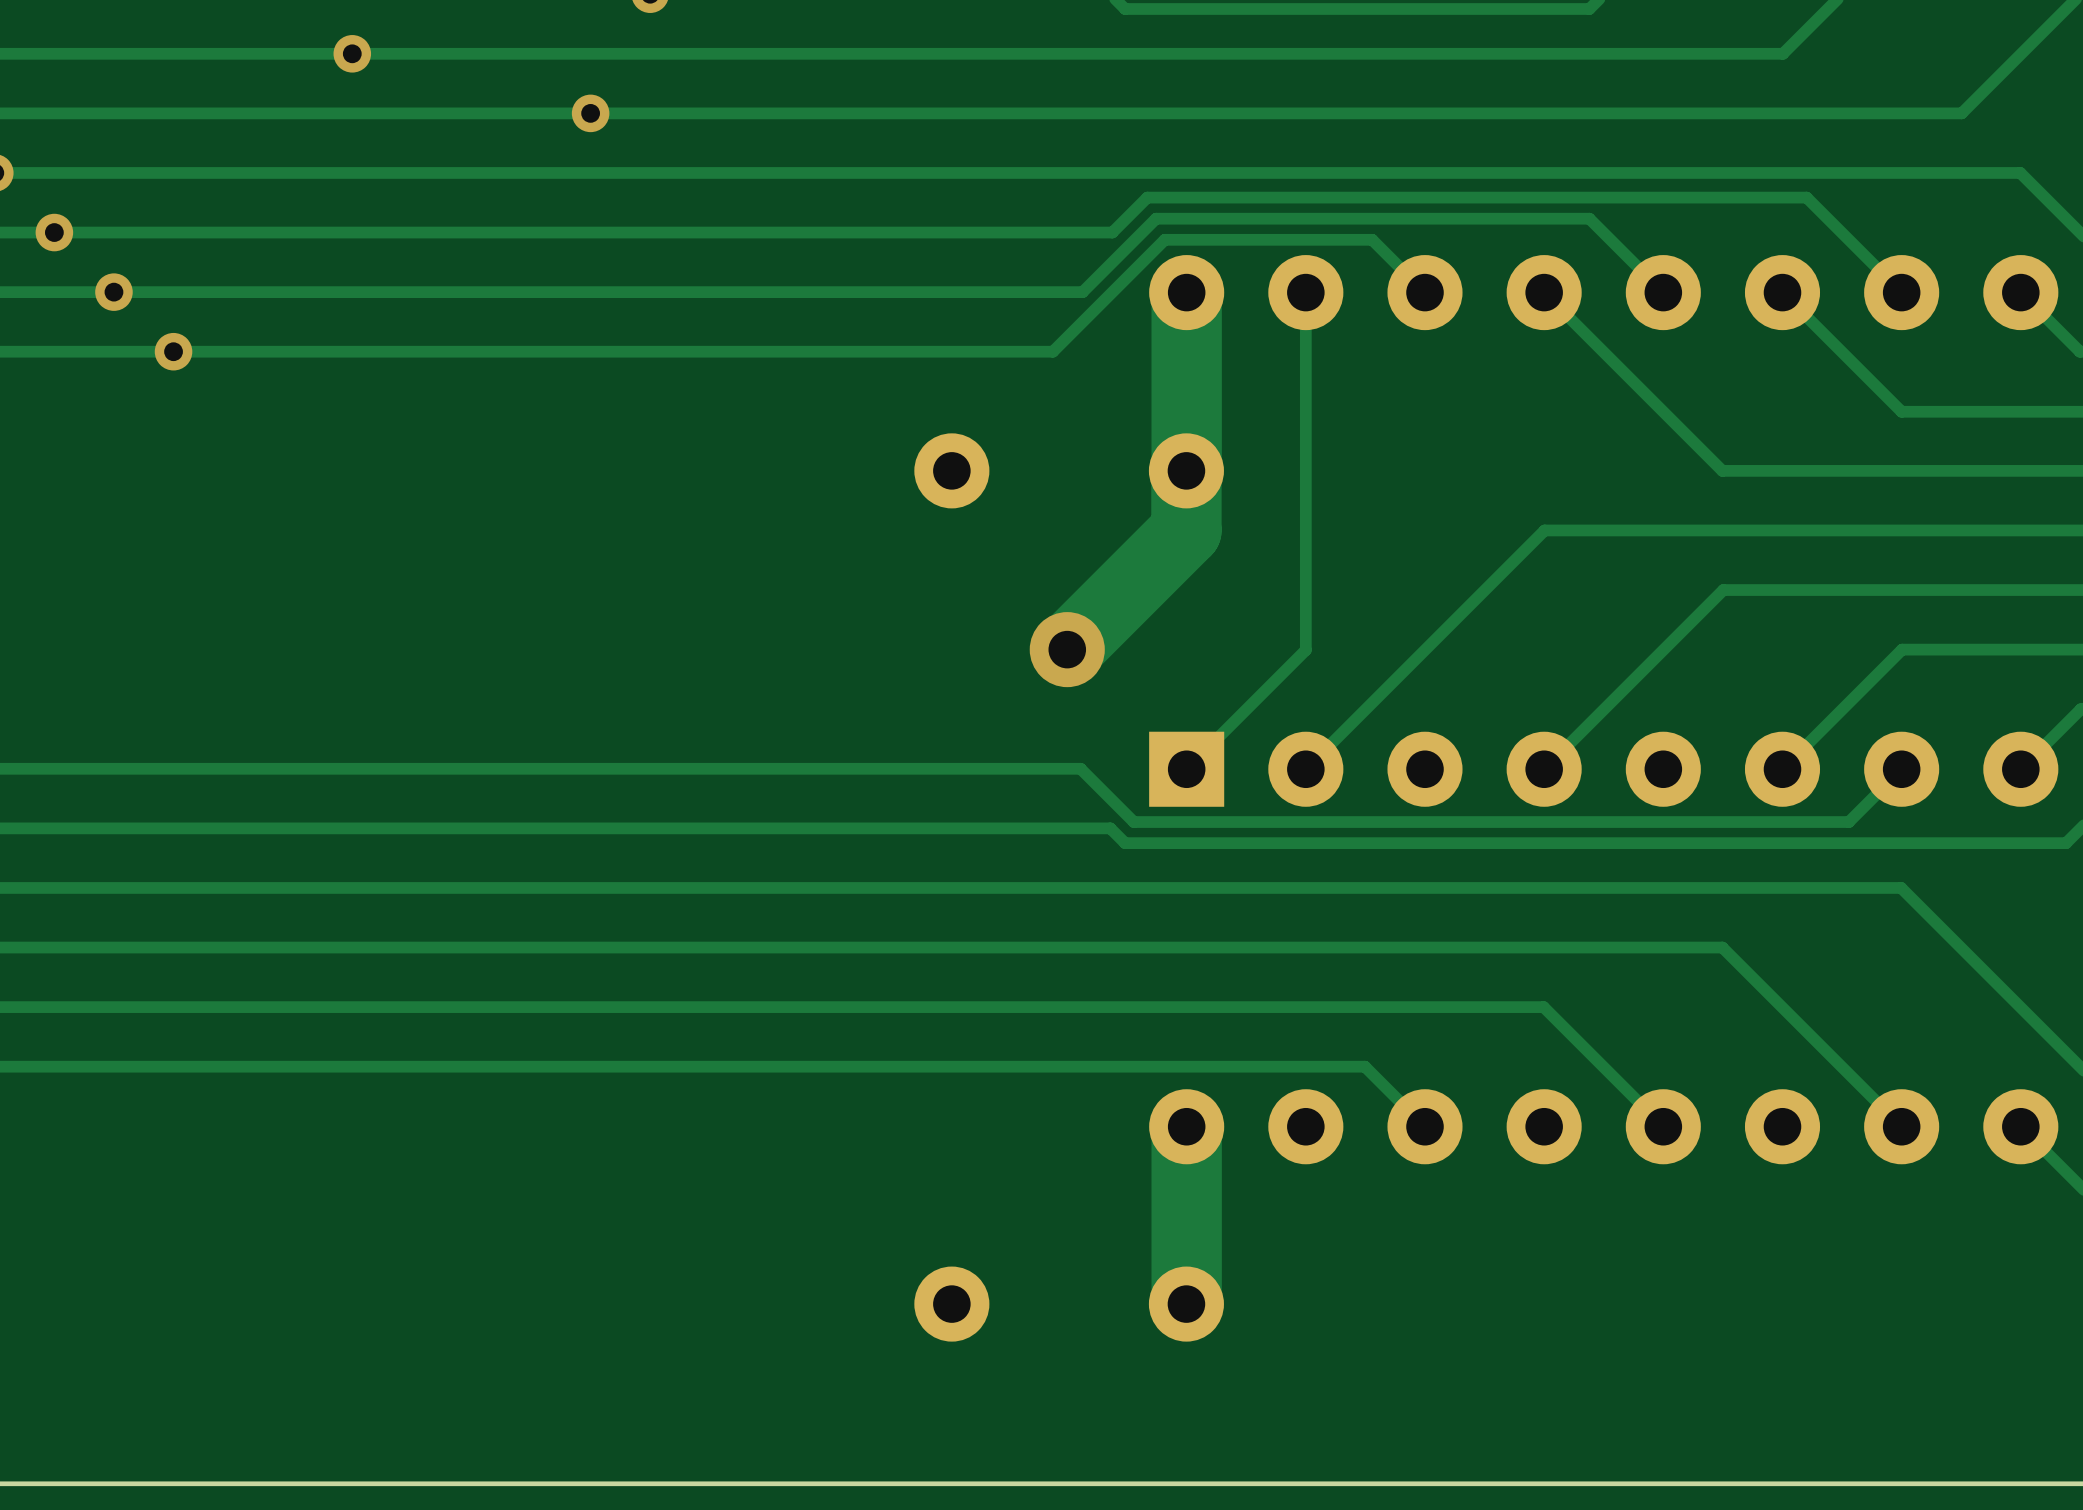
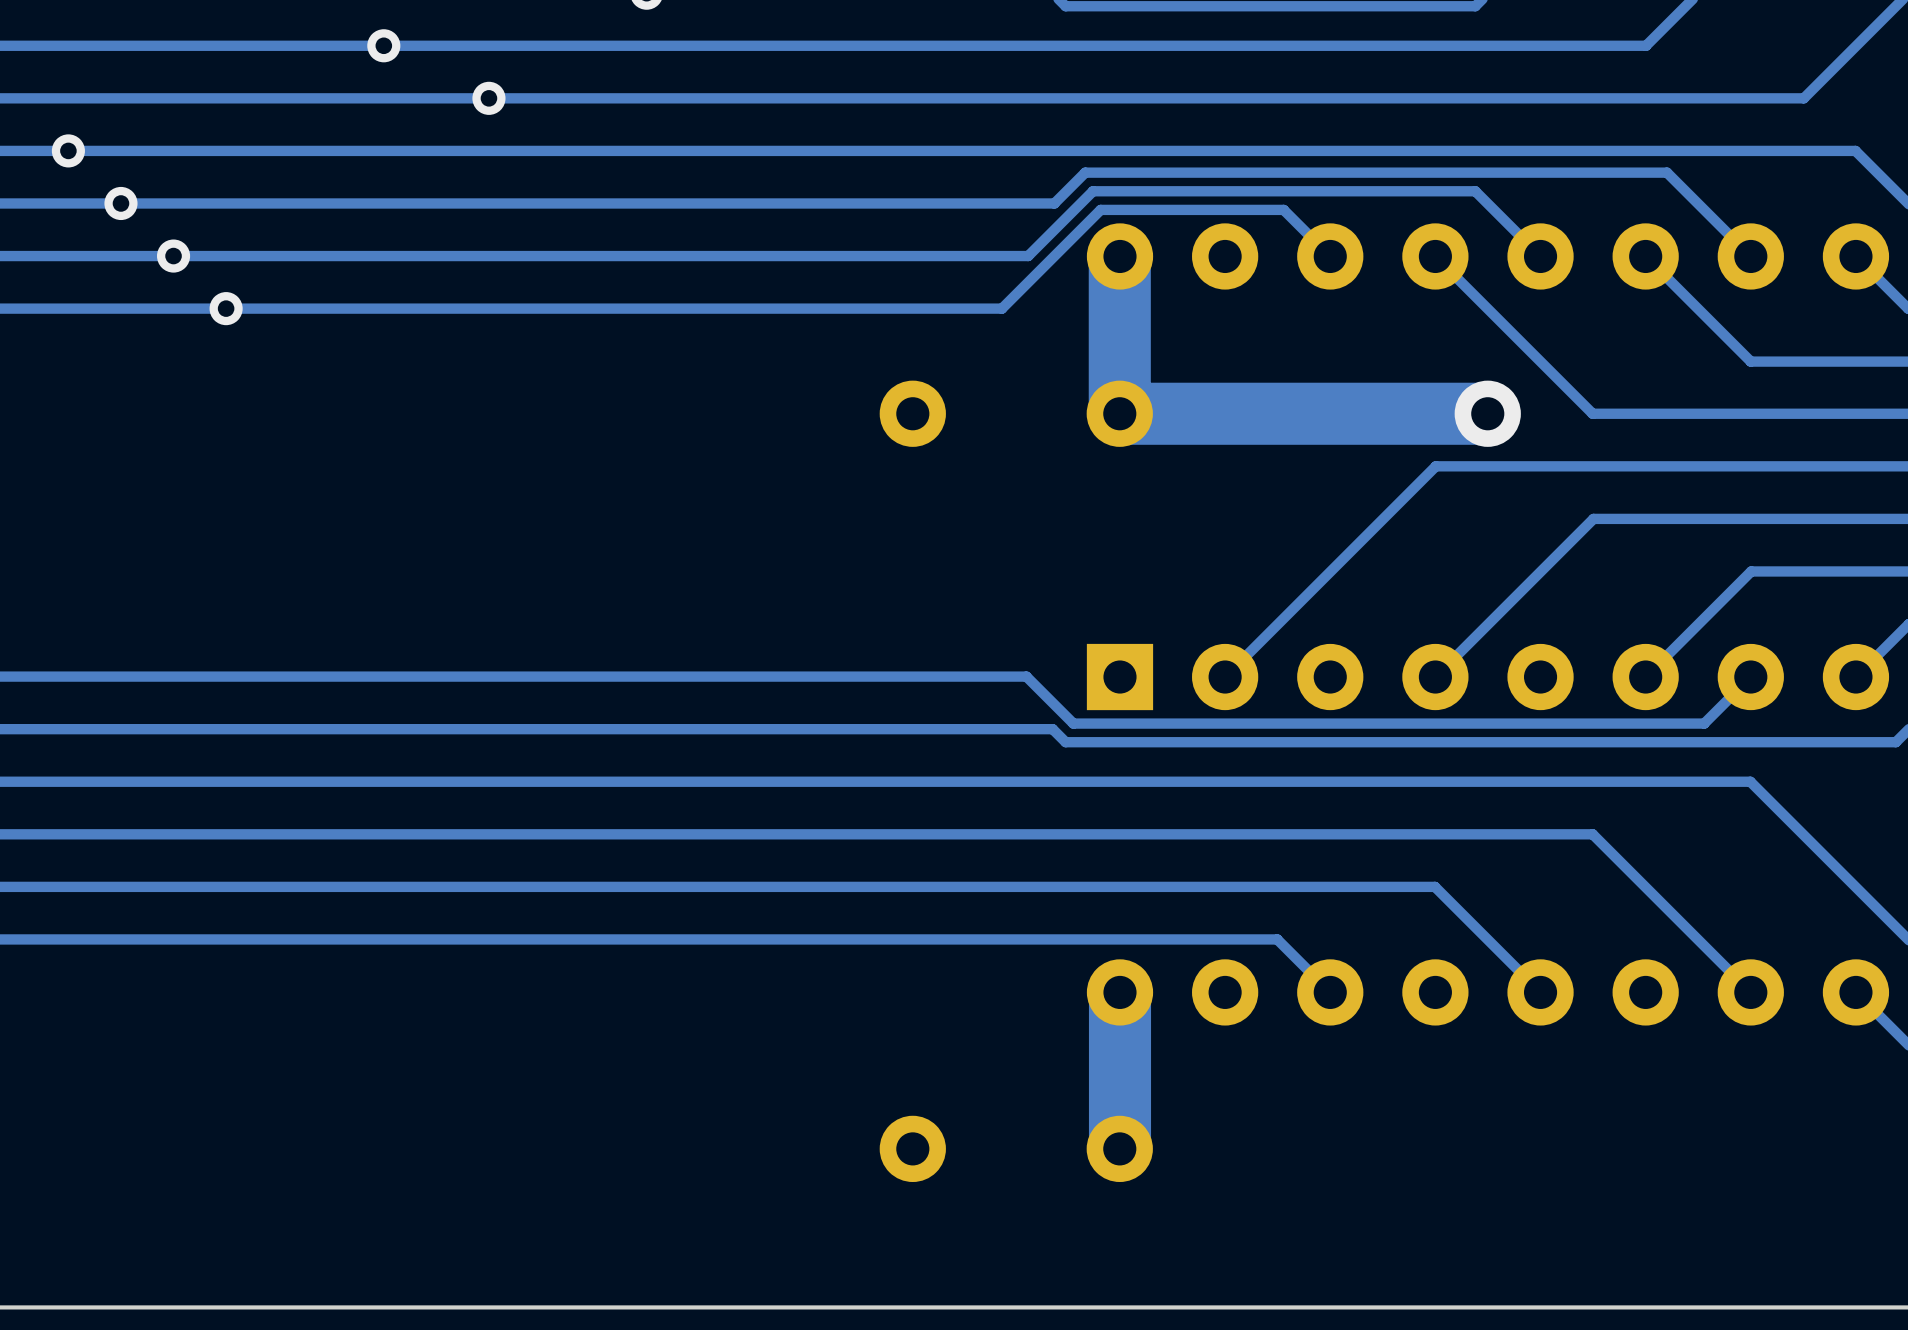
via position: (590, 113) -> (488, 98)
track: (1186, 292) (1186, 470) -> (1119, 256) (1119, 413) (1487, 413)
track: (1305, 292) (1305, 650) (1186, 769) -> none
track: (1186, 470) (1186, 530) (1067, 649) -> none
via: none -> (1487, 413)
via: (1067, 649) -> none

